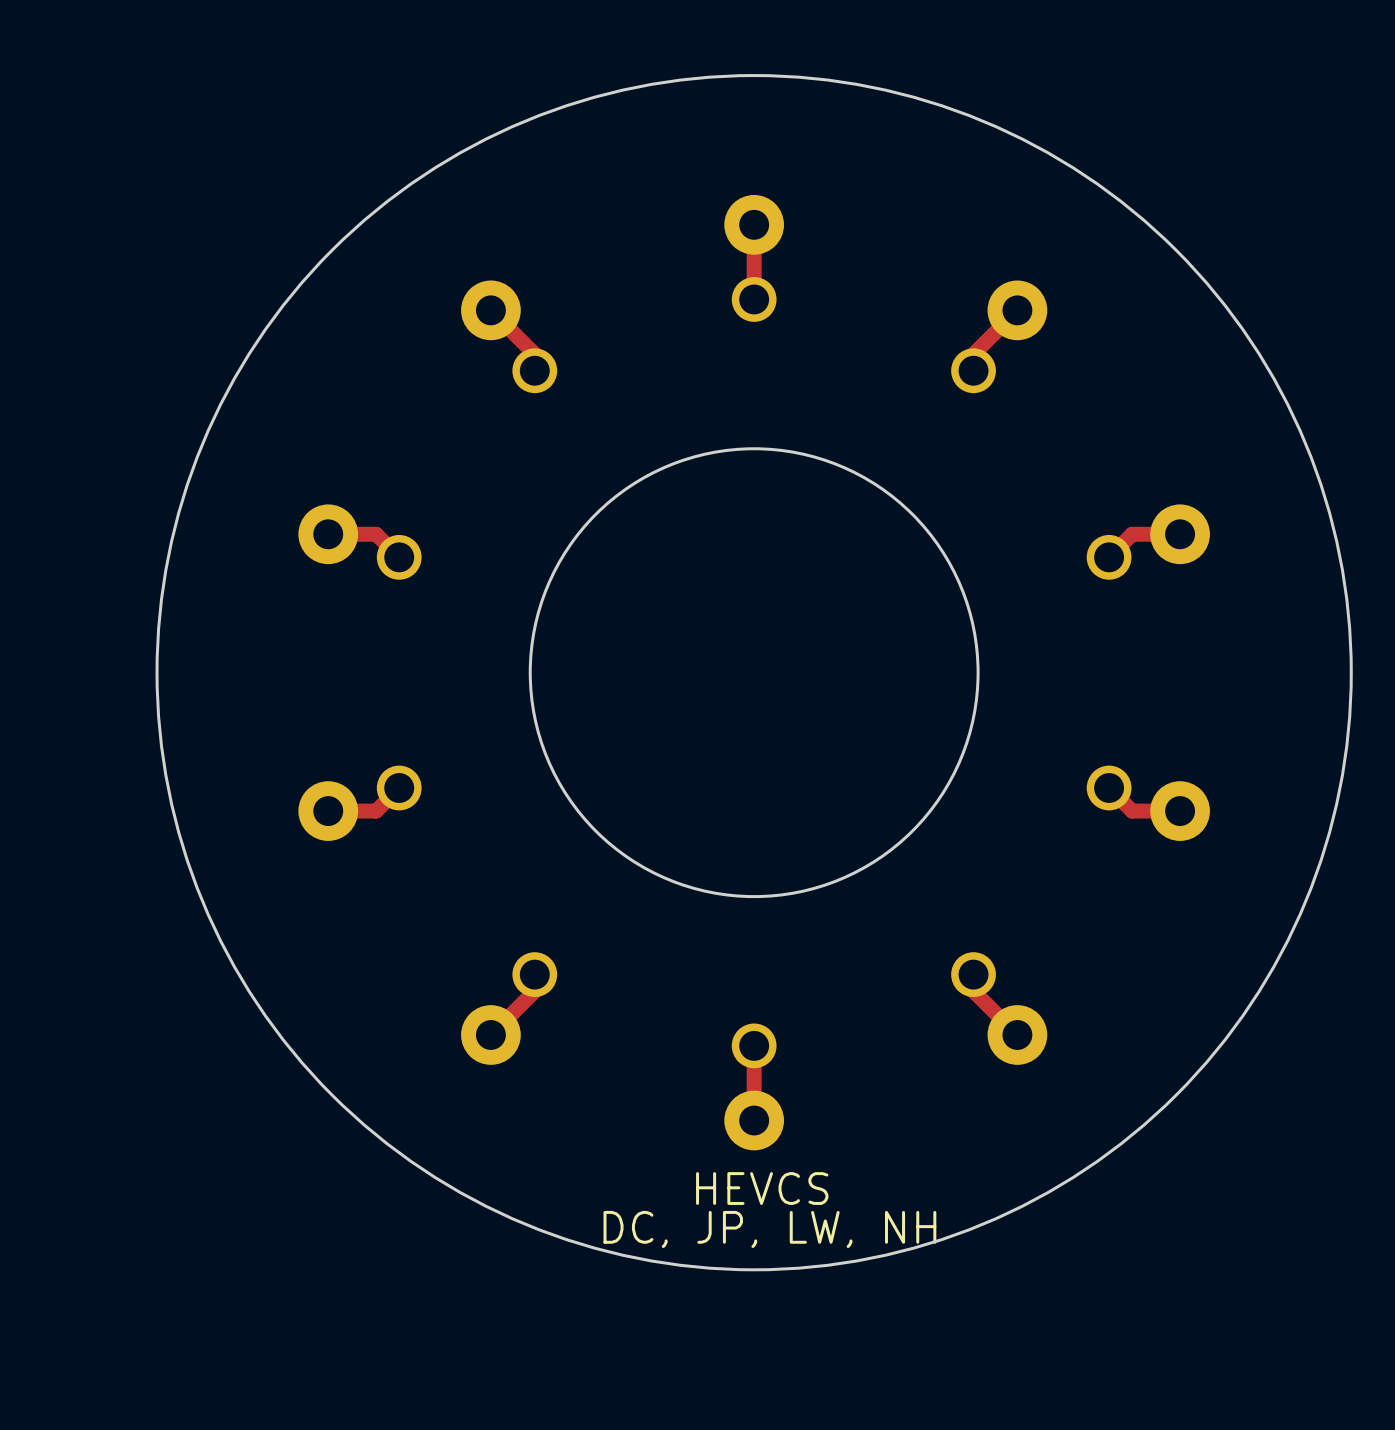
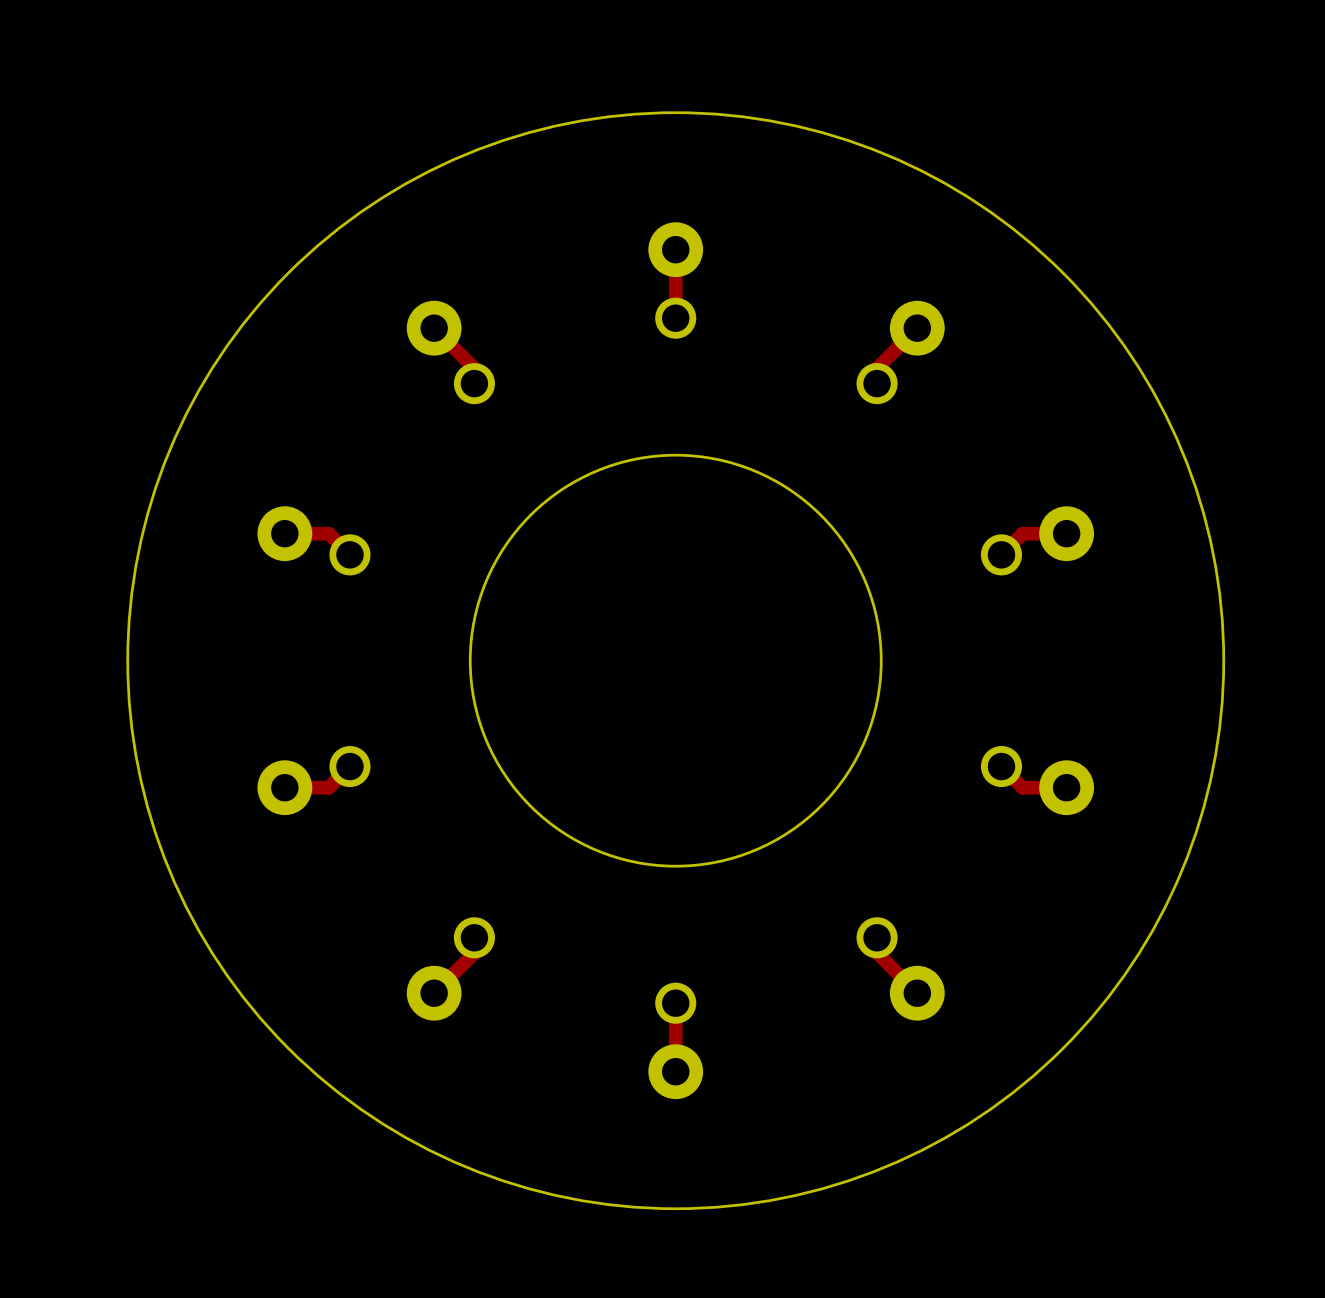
text: HEVCS (762, 1188) -> none
text: DC, JP, LW, NH (769, 1229) -> none

